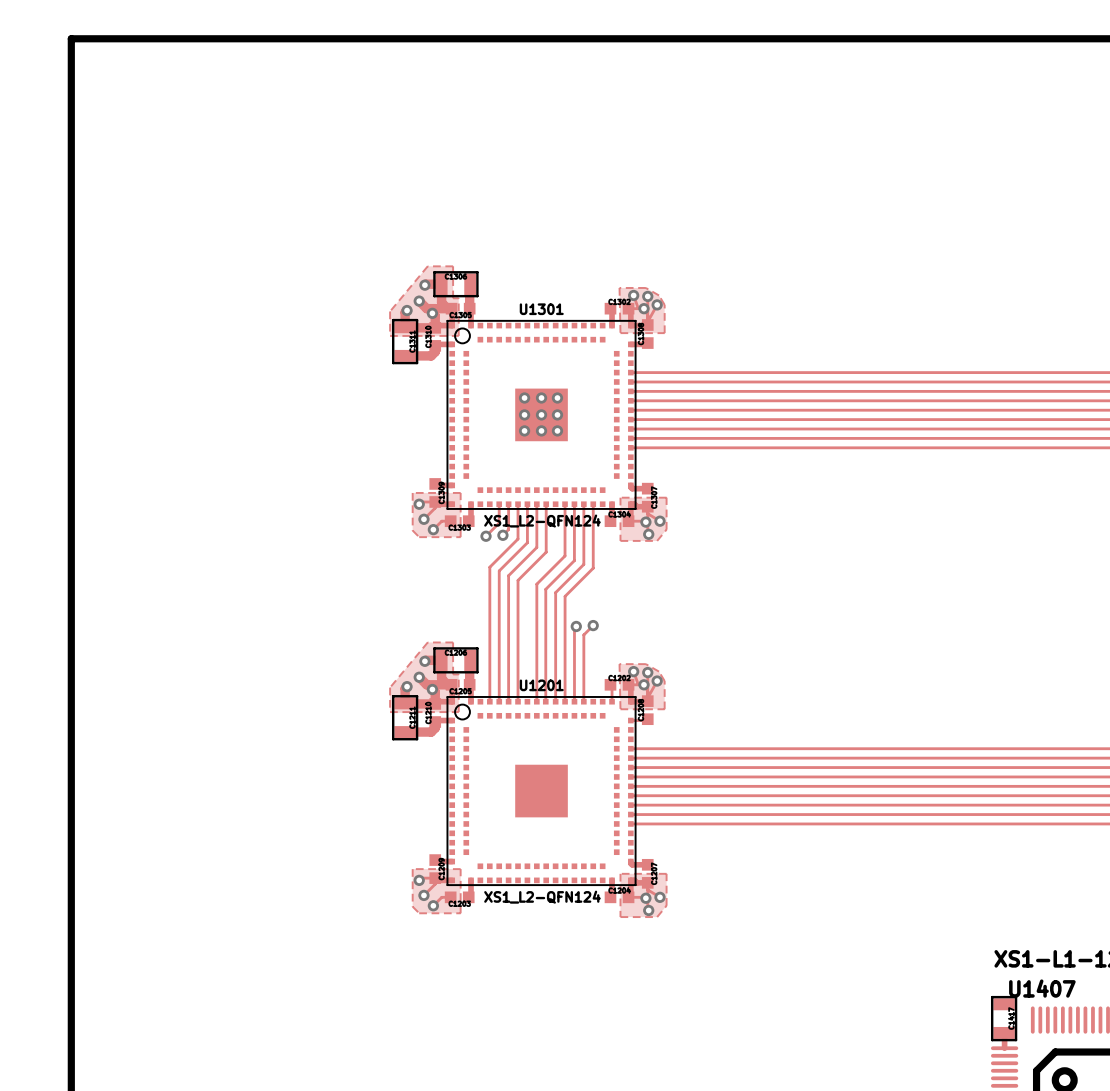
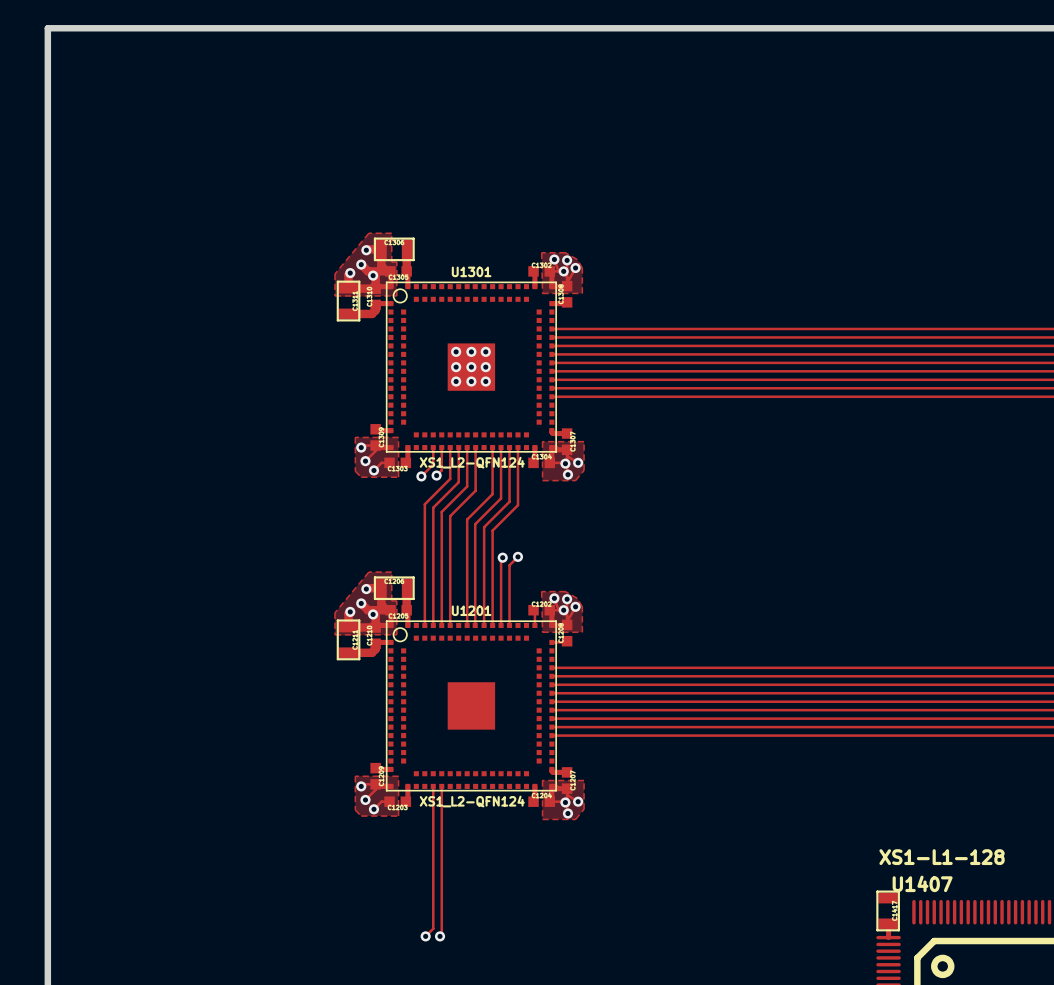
track: none -> (433, 786) (433, 928) (425, 936)
track: none -> (441, 786) (441, 934) (440, 936)
via: none -> (425, 936)
via: none -> (440, 936)

